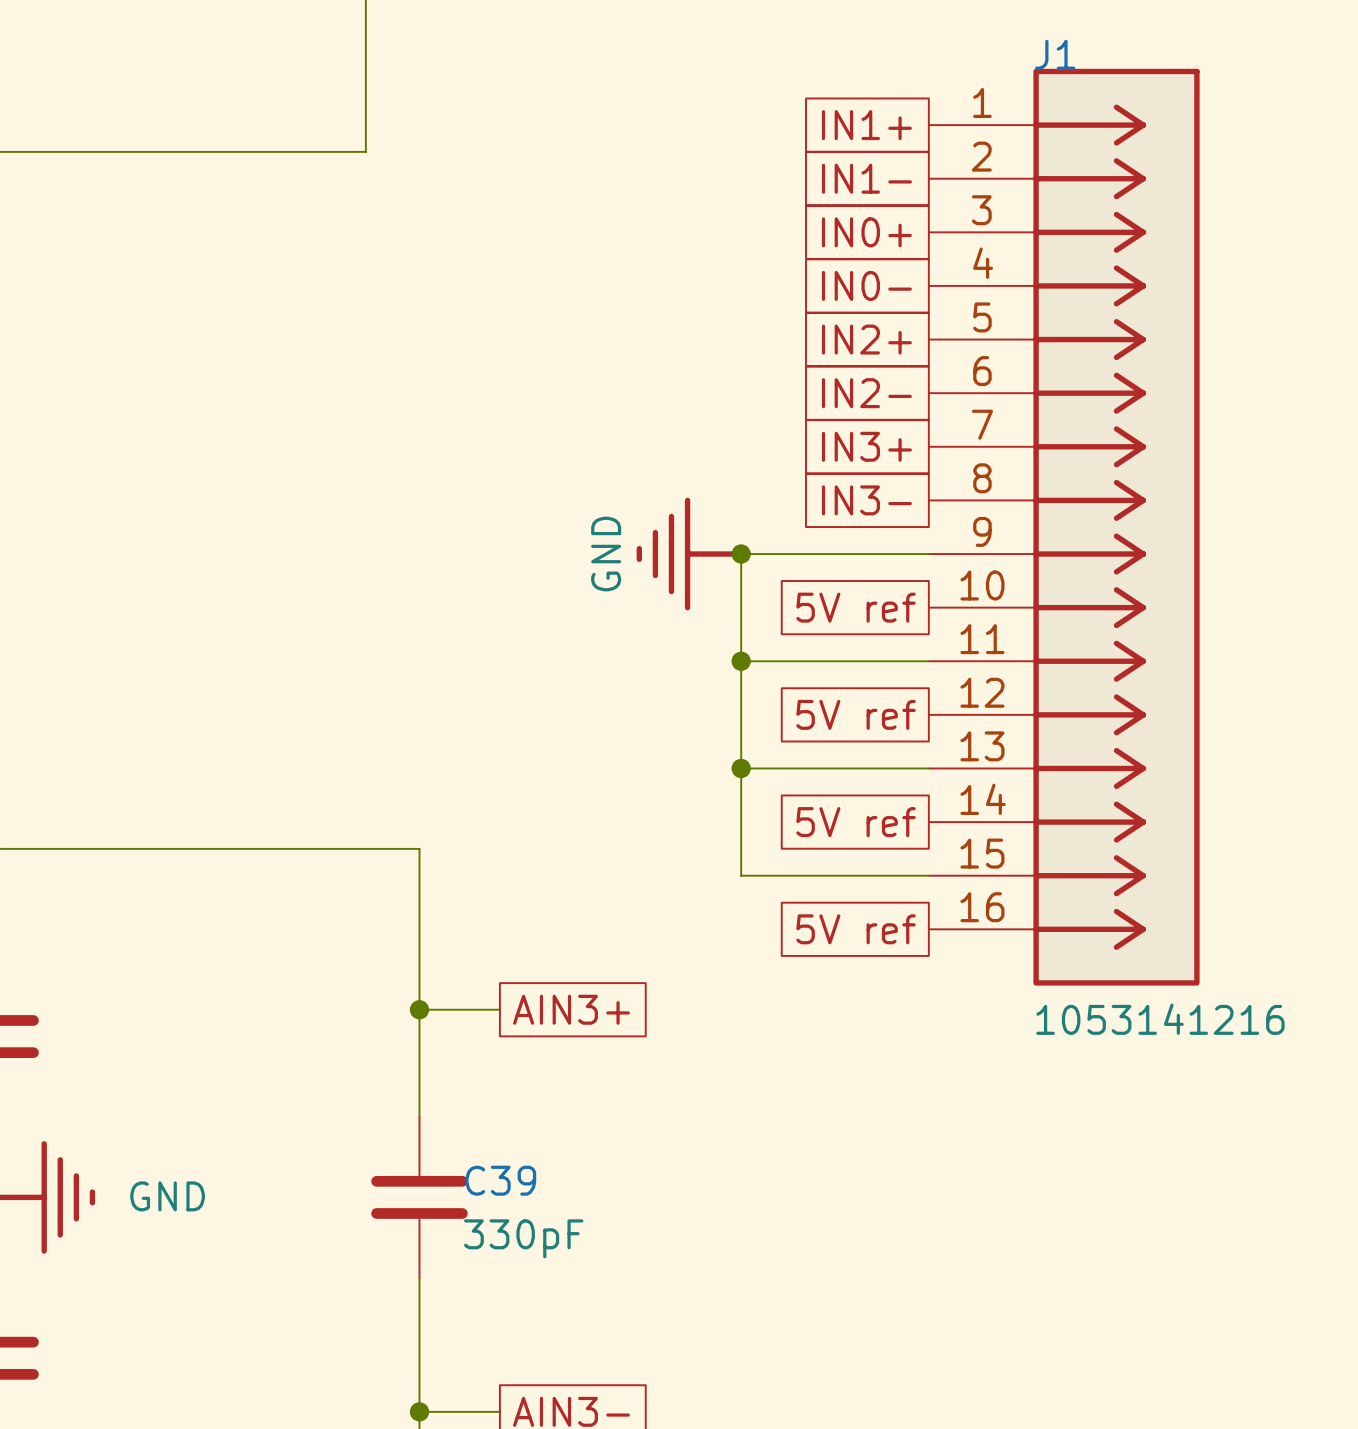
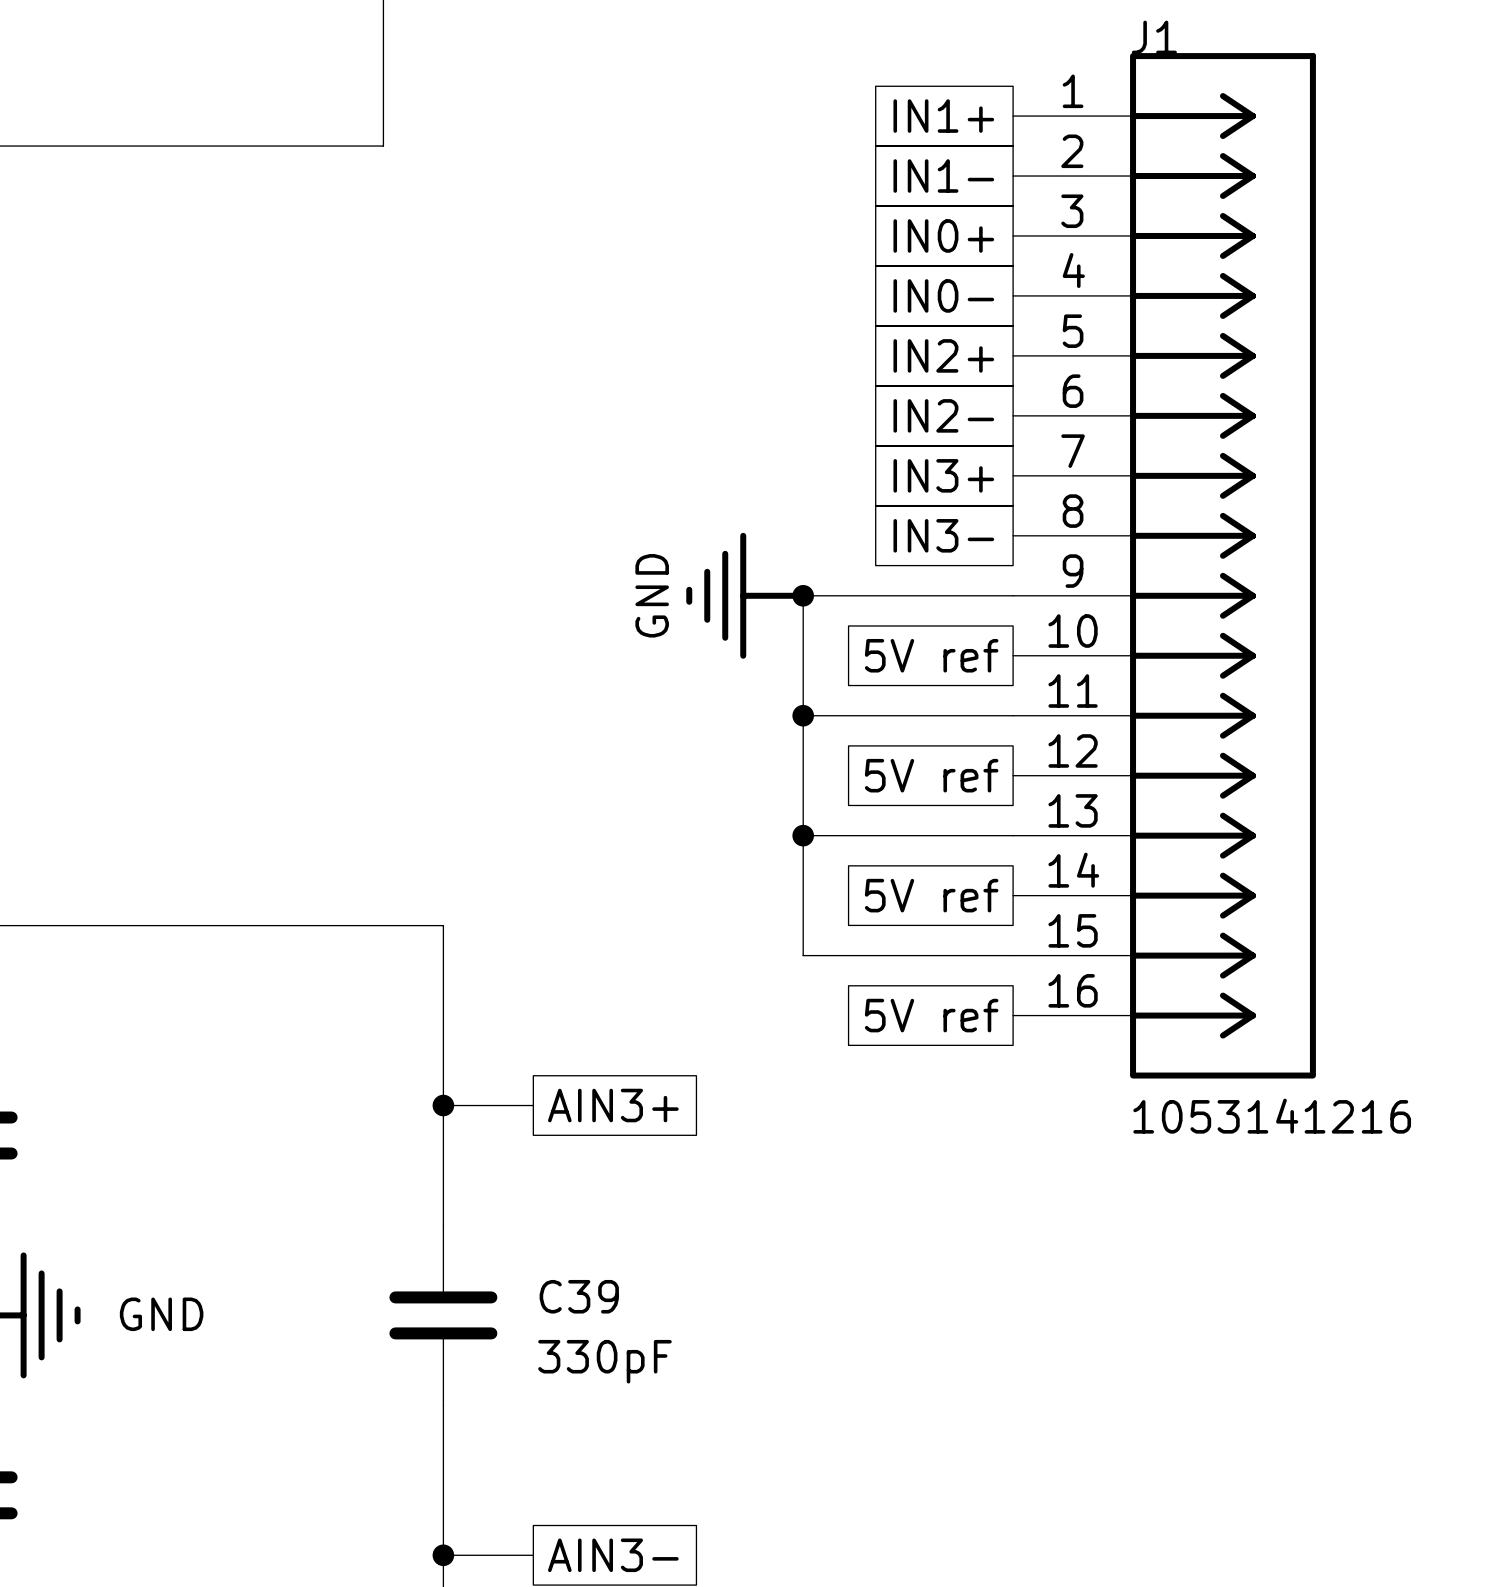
C39 name position: C39 (500, 1180) -> C39 (579, 1296)
C39 value position: 330pF (523, 1238) -> 330pF (604, 1361)

